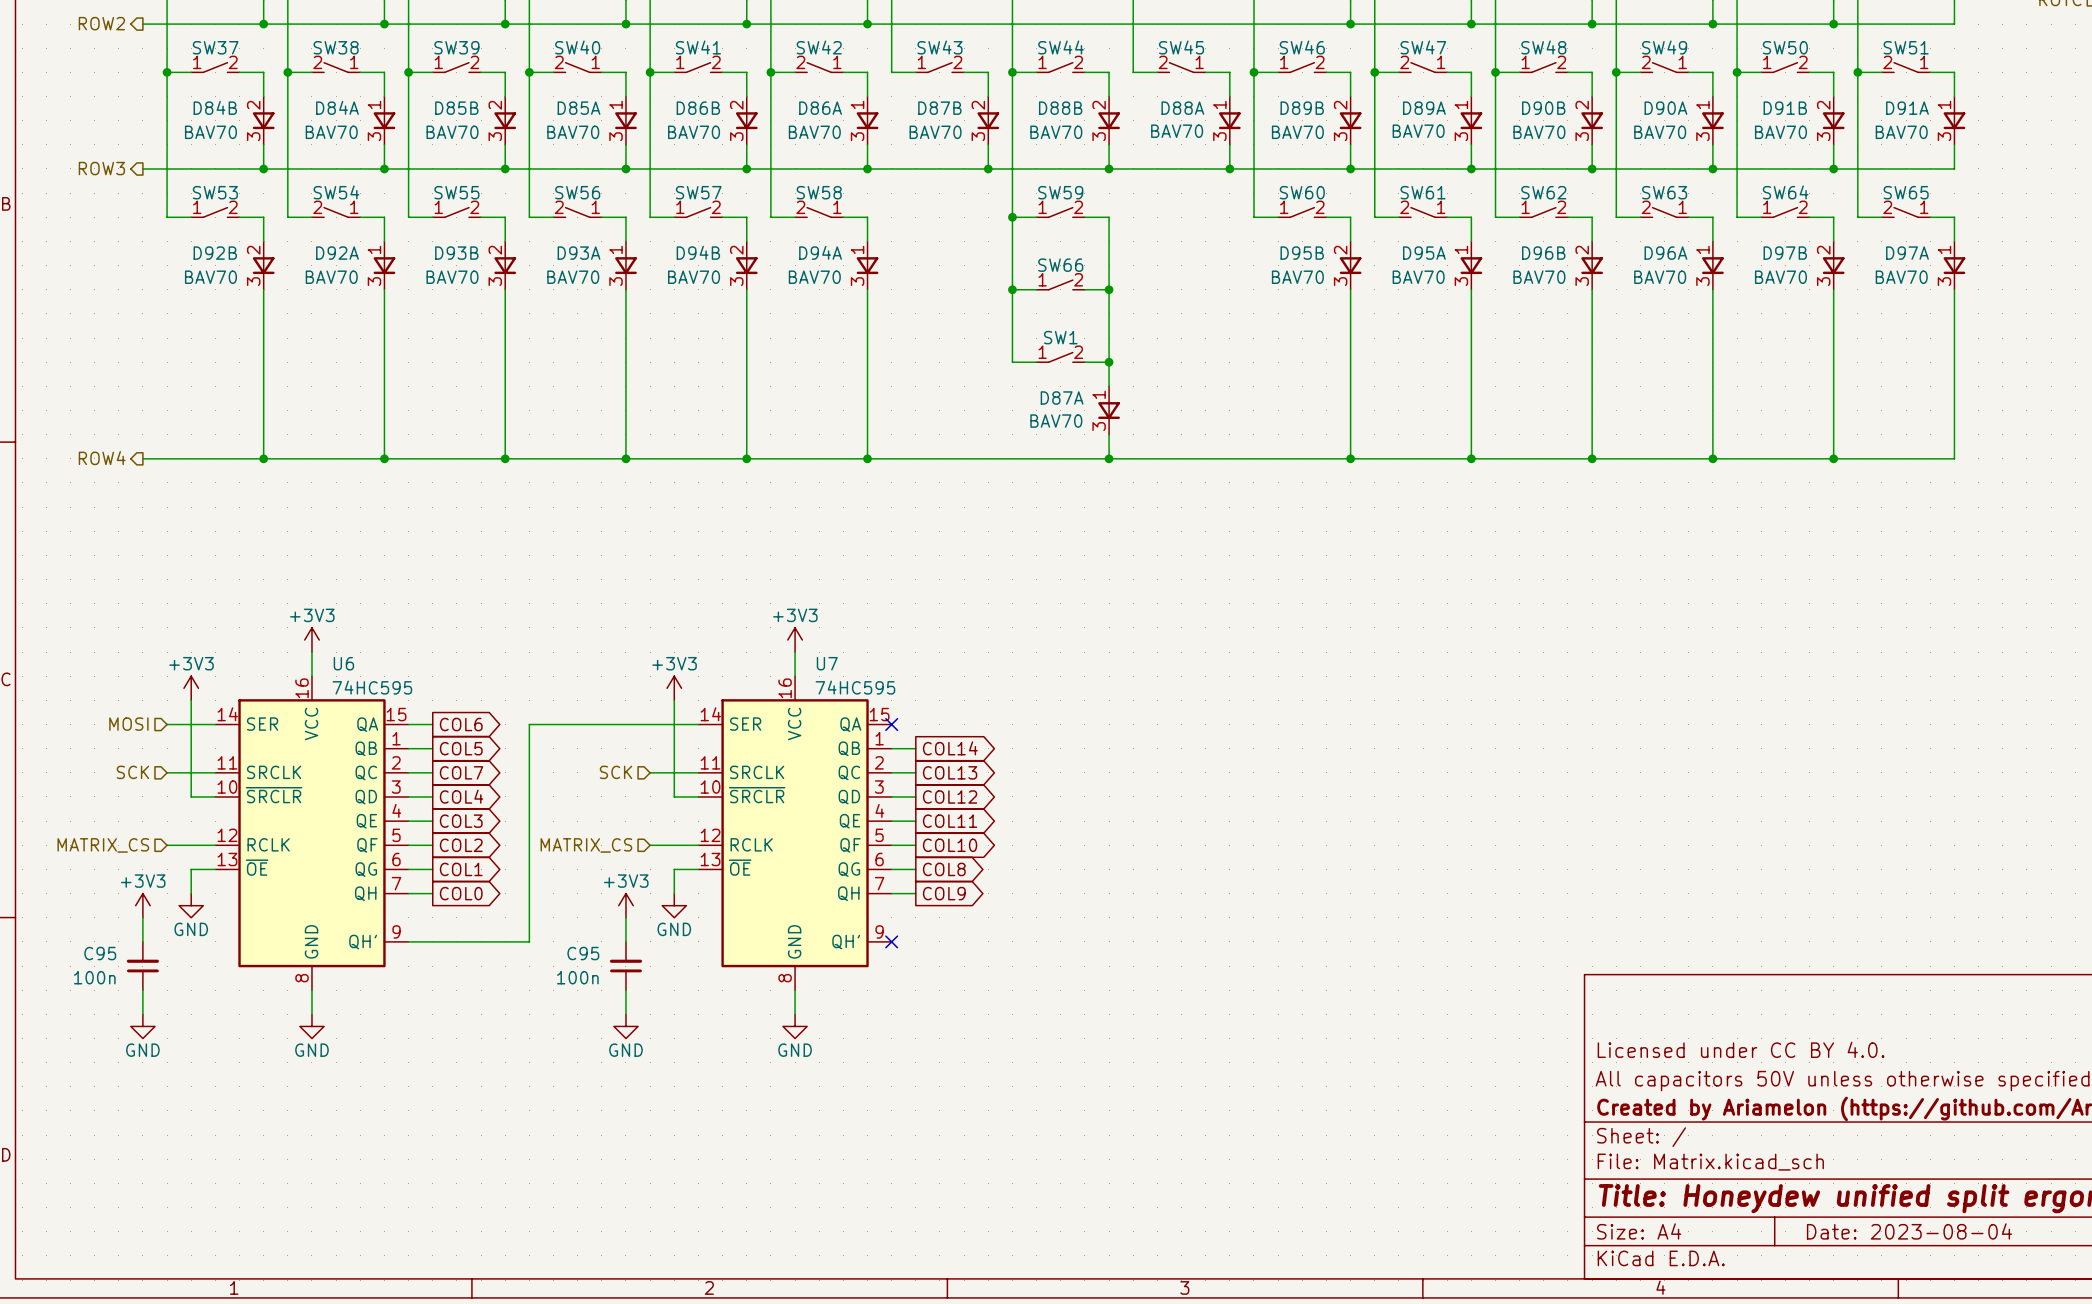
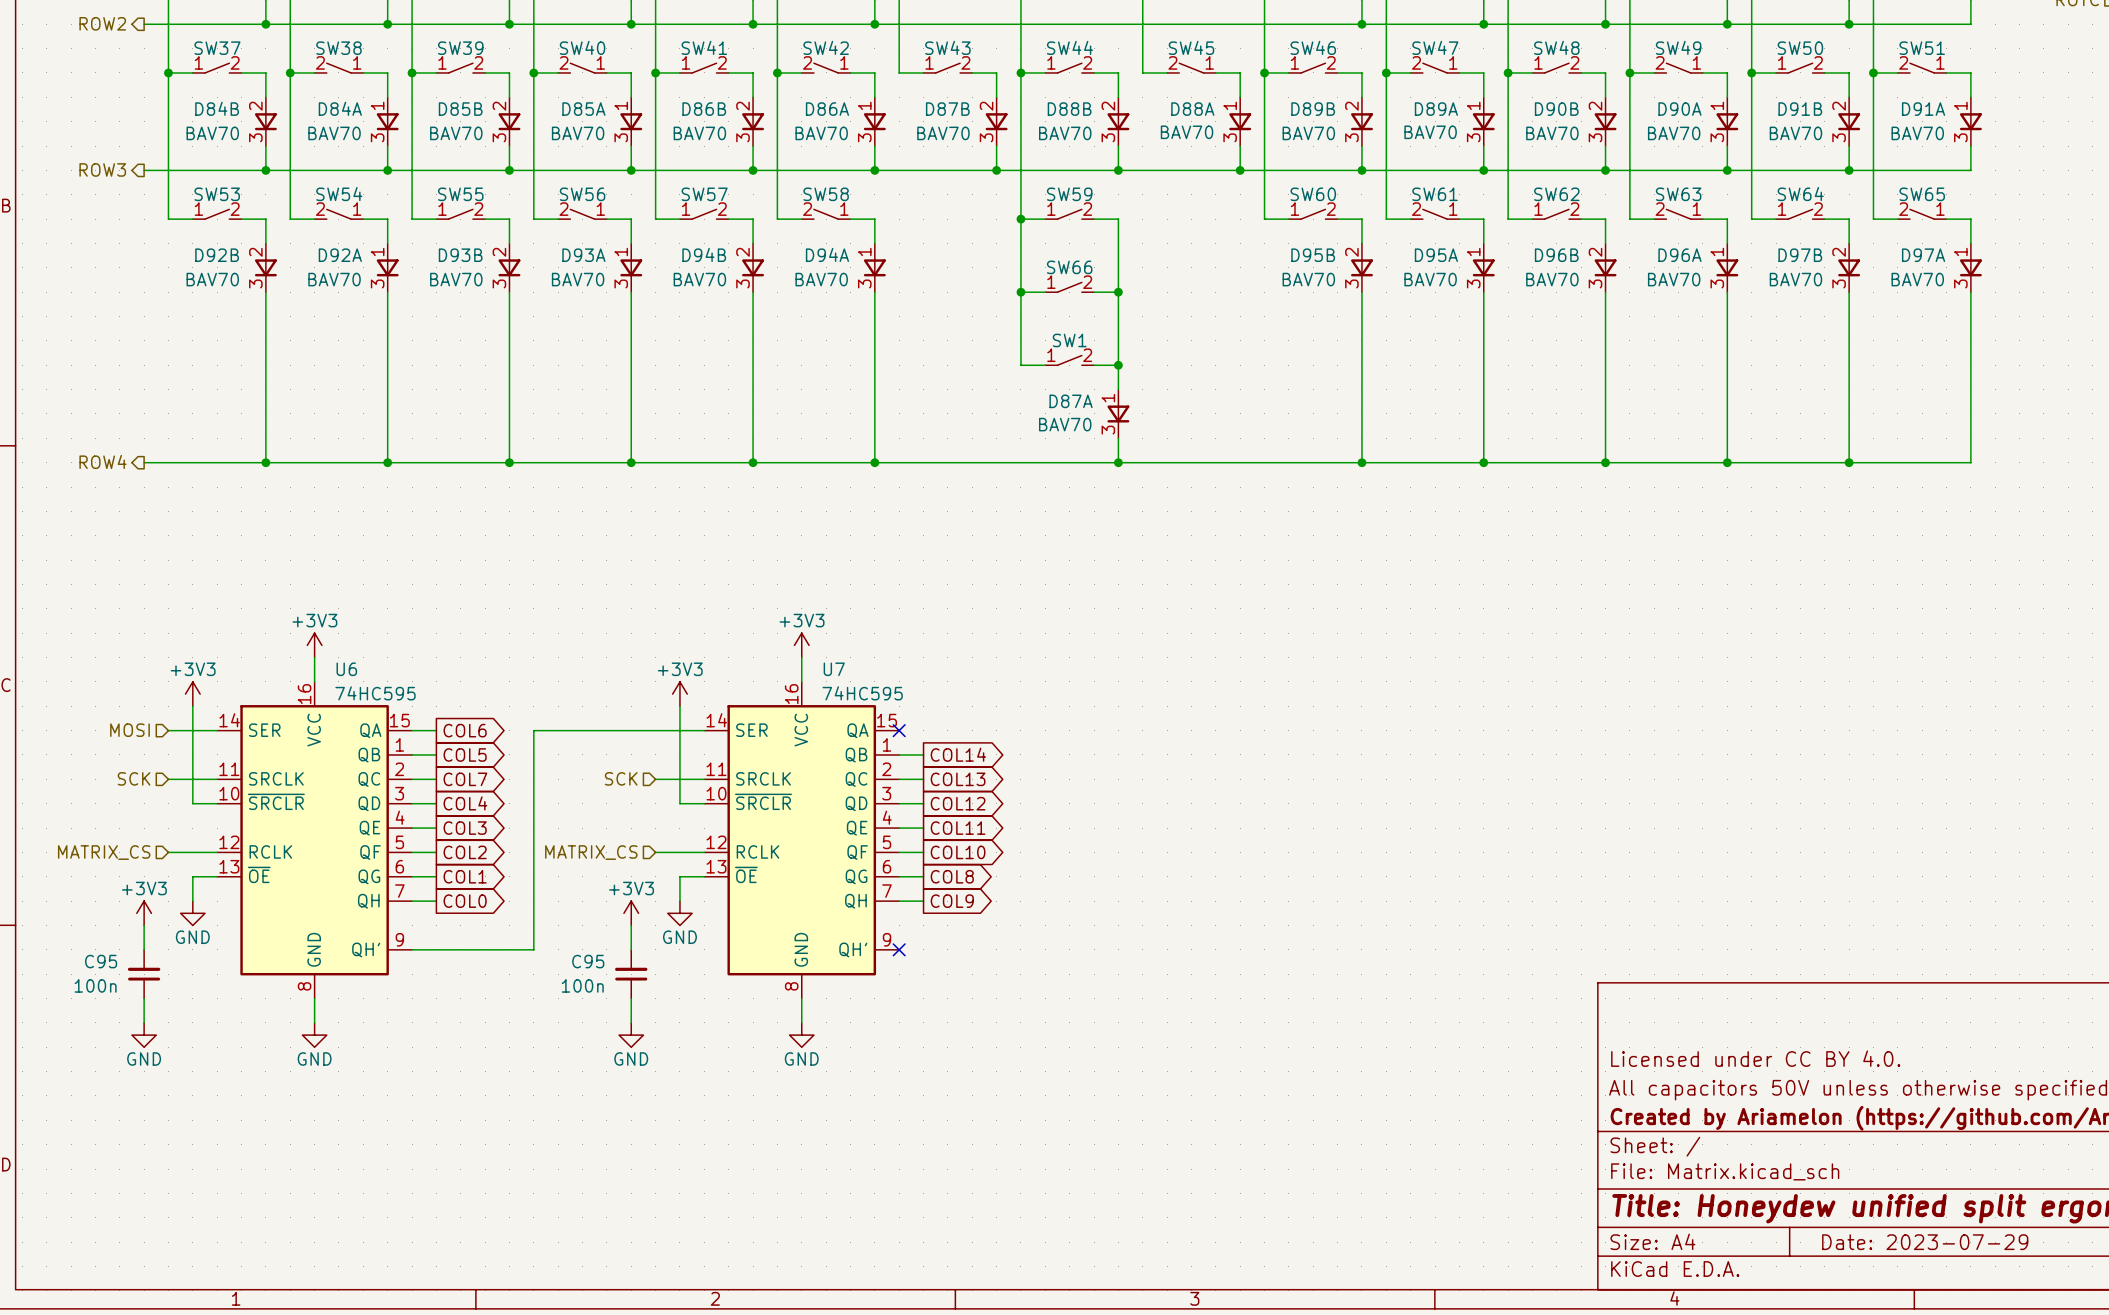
title block: Date: 2023-08-04 (1909, 1231) -> Date: 2023-07-29 (1925, 1242)

